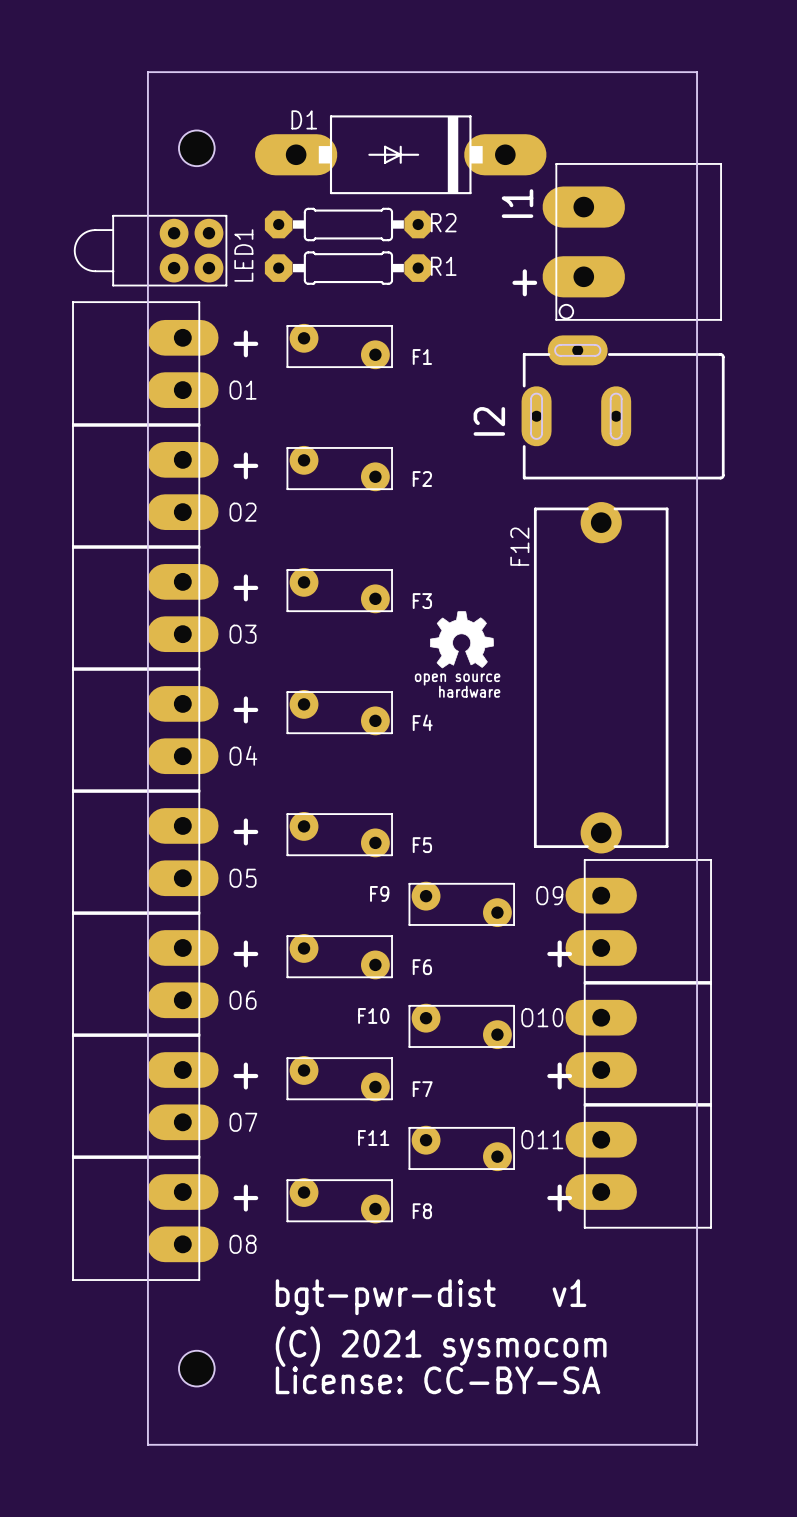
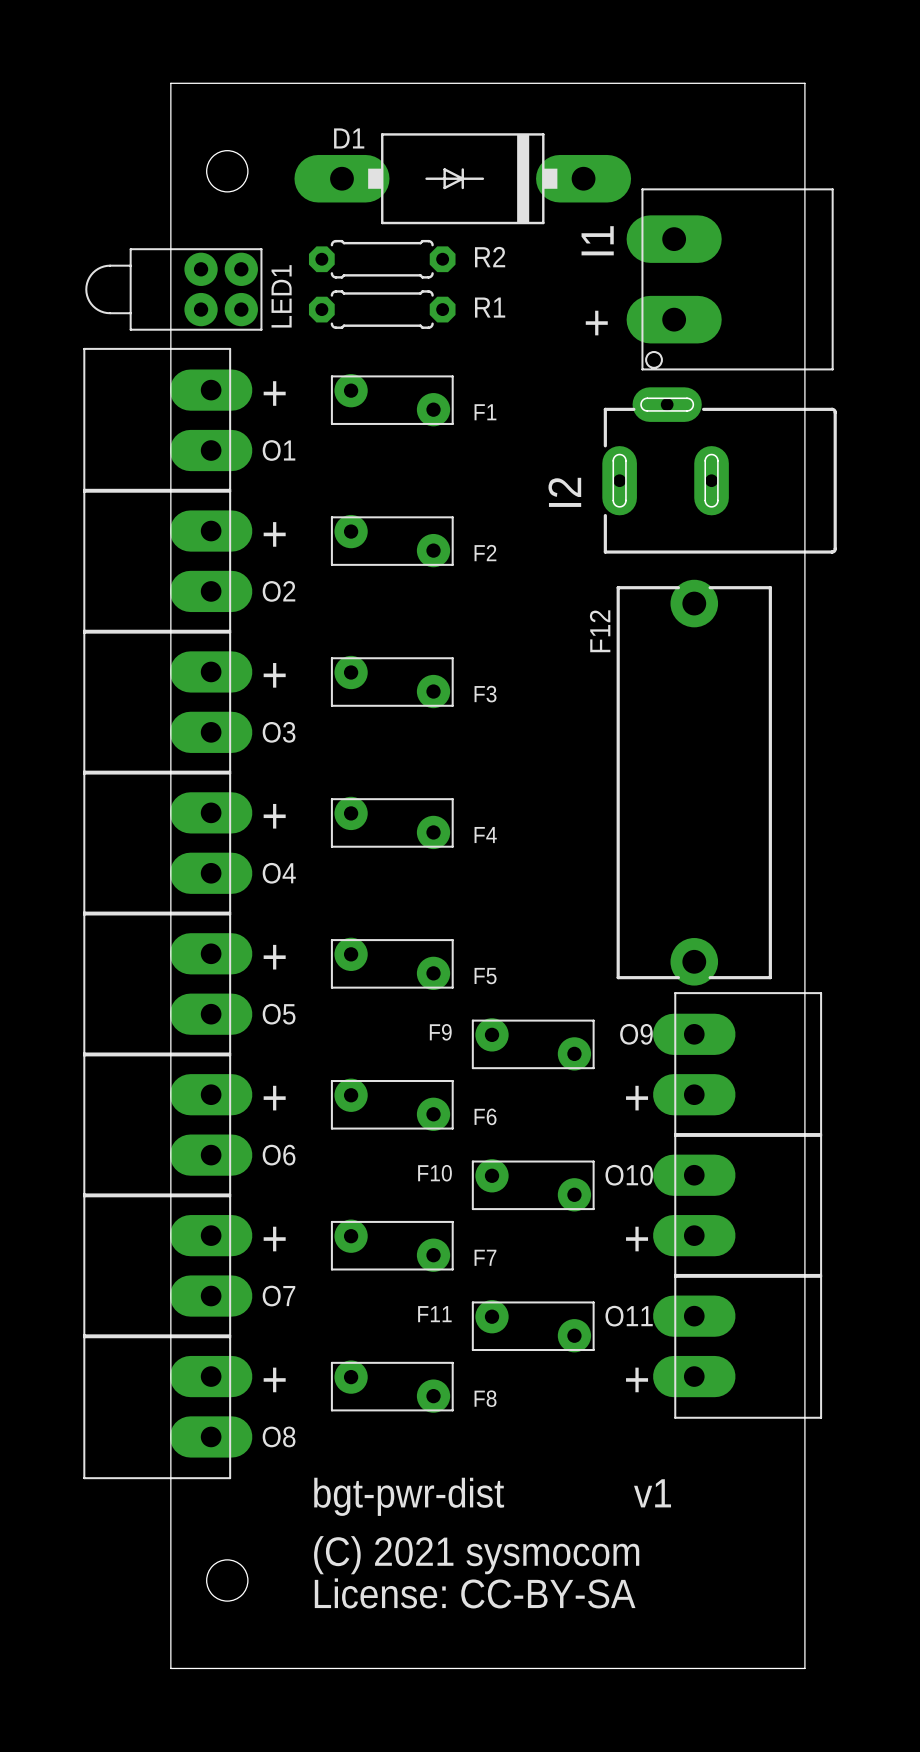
R2 footprint: [264, 207, 432, 242] -> [308, 239, 456, 279]
R1 footprint: [264, 251, 432, 285] -> [308, 290, 456, 329]
drawing: [430, 611, 494, 669] -> none

